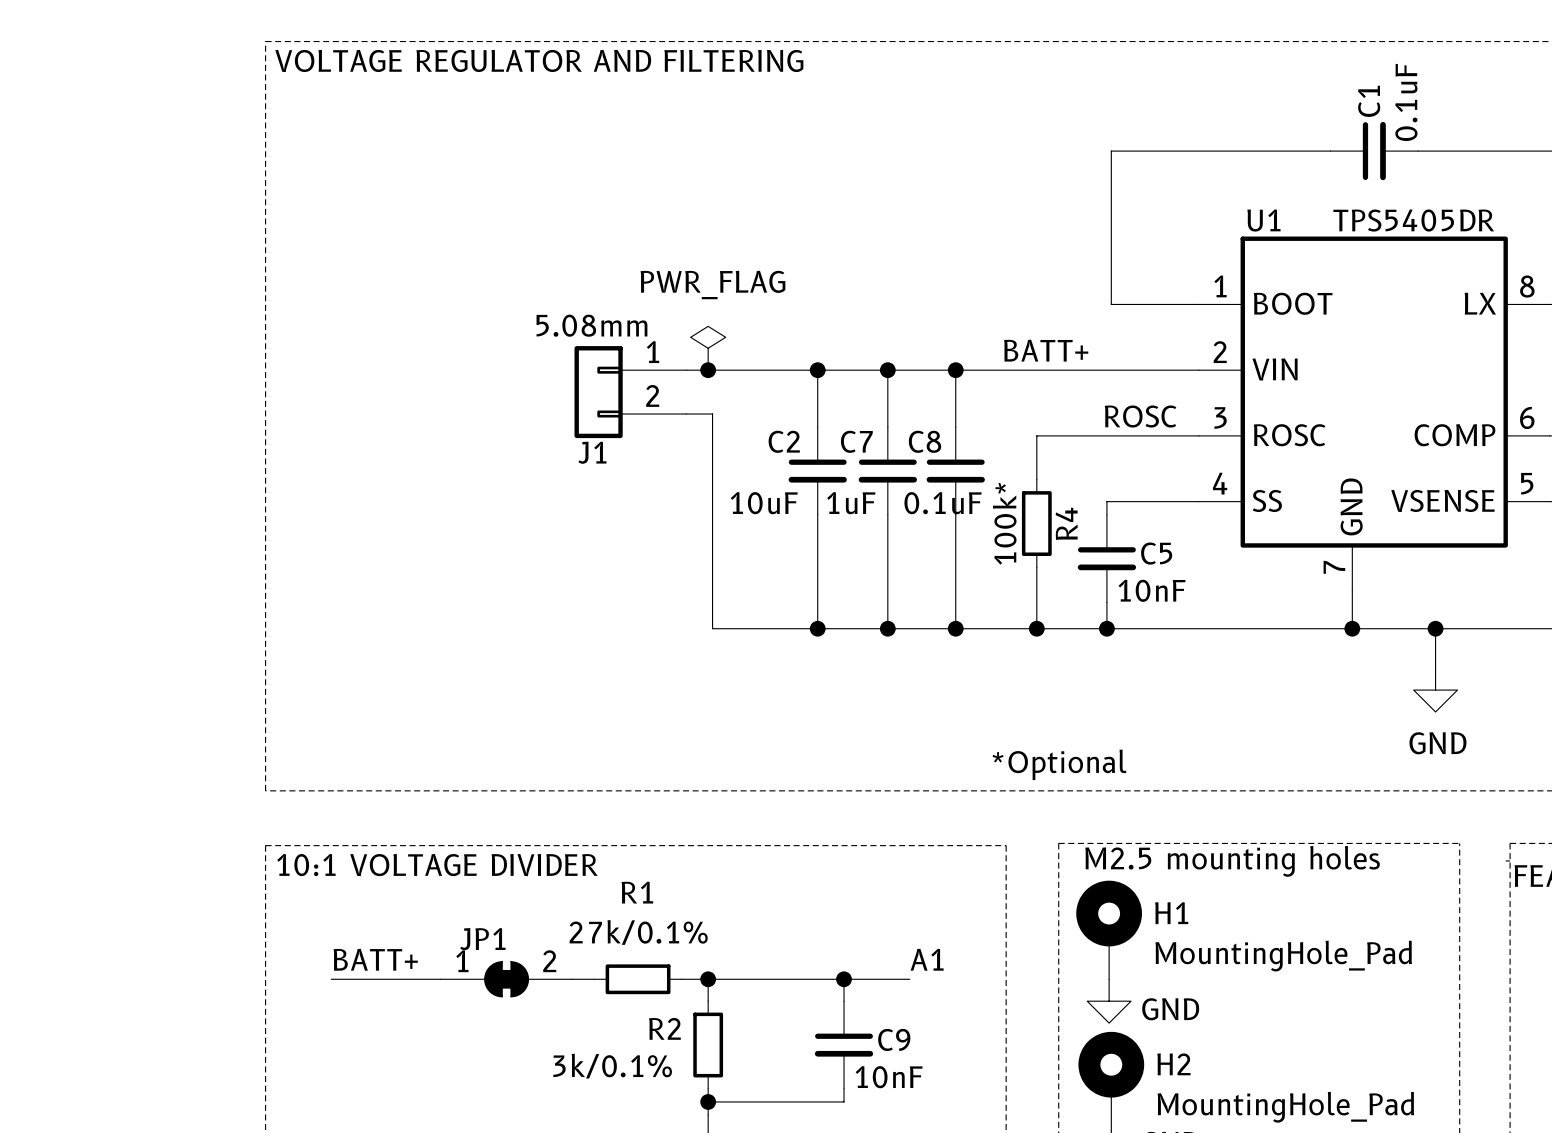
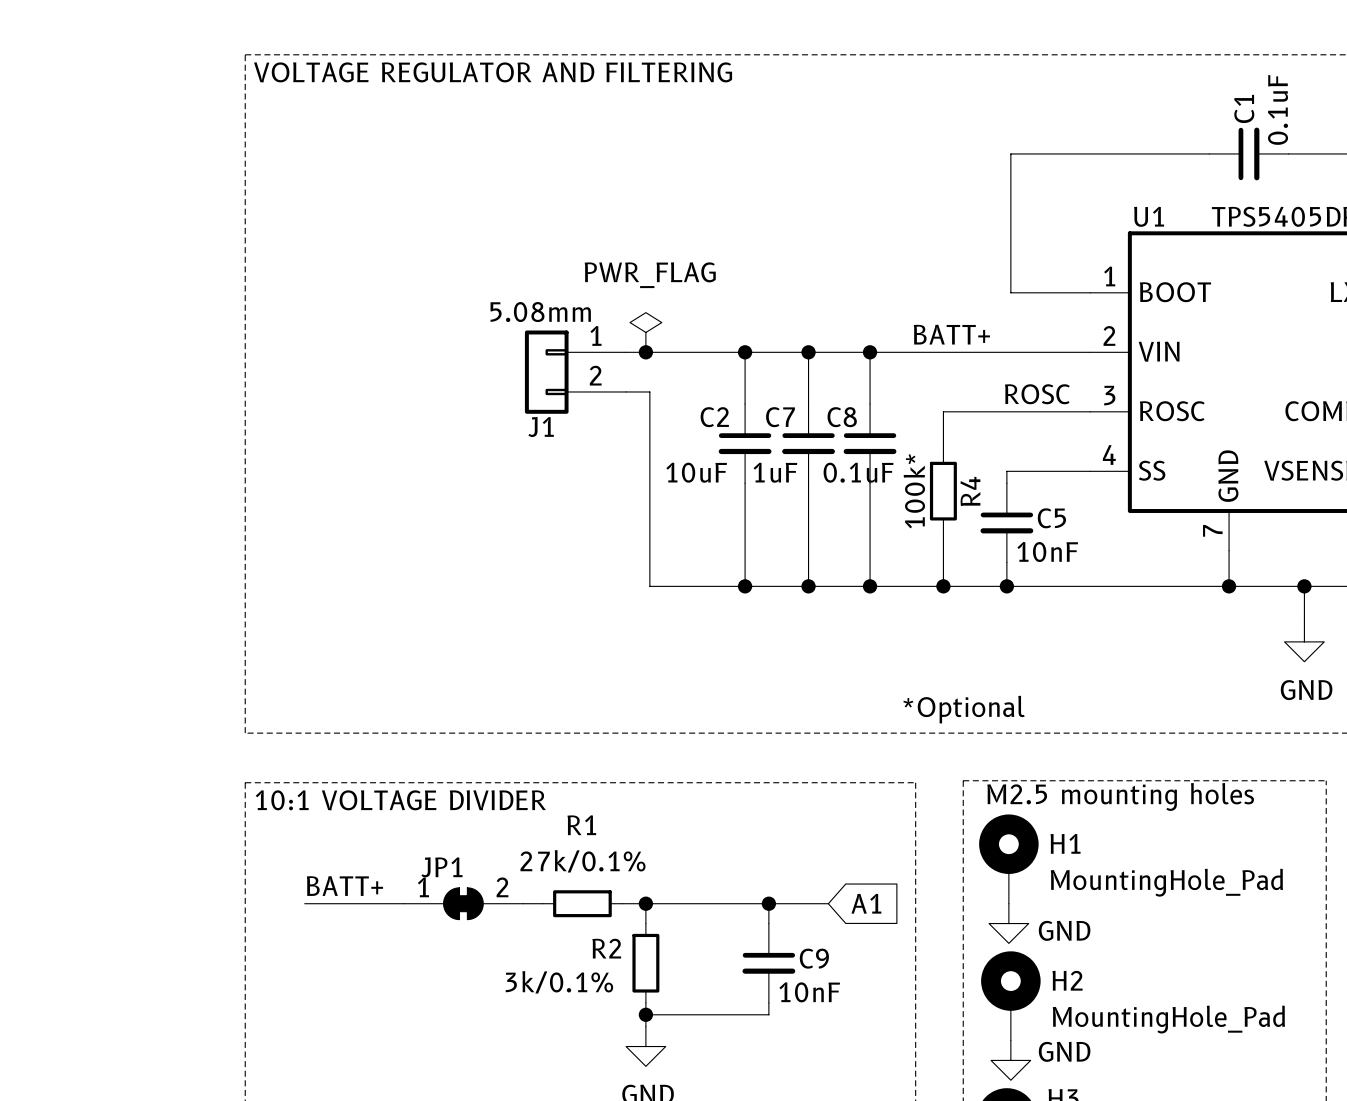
label: A1 (927, 959) -> none
global label: none -> A1 (866, 903)

